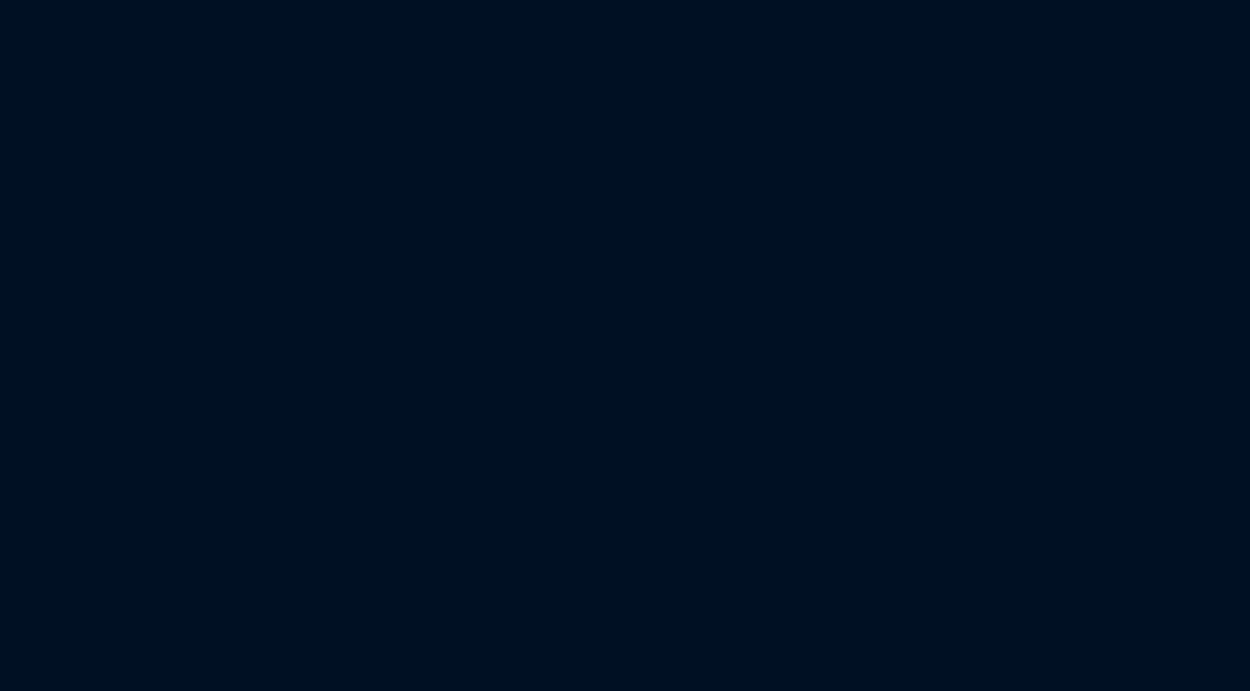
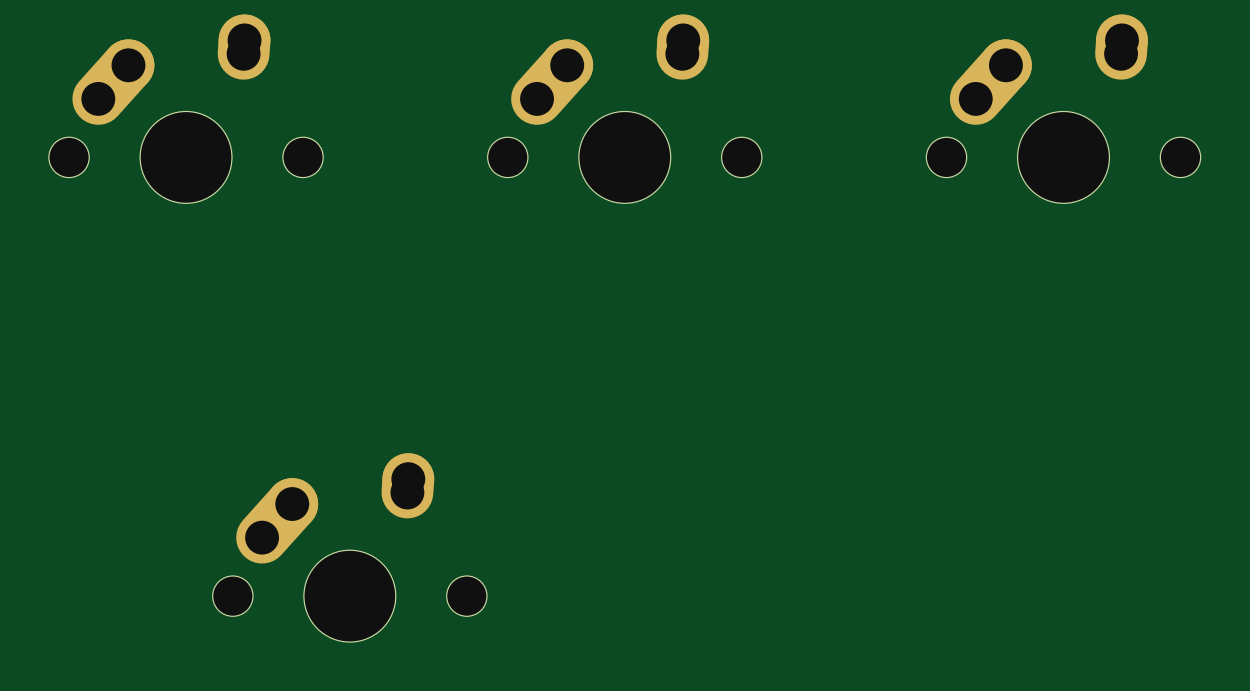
part: none -> (186, 108)
part: none -> (624, 108)
part: none -> (1063, 108)
part: none -> (349, 547)

